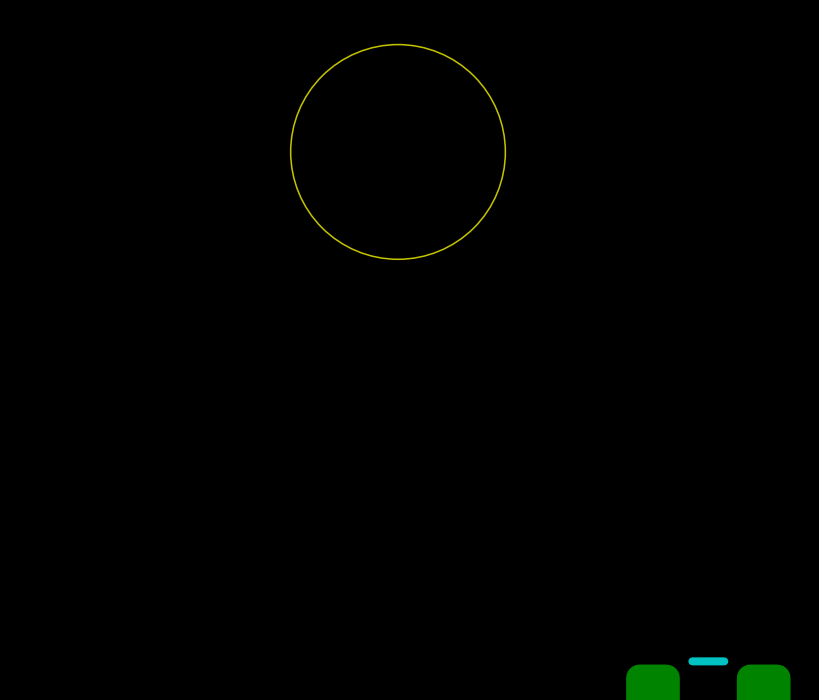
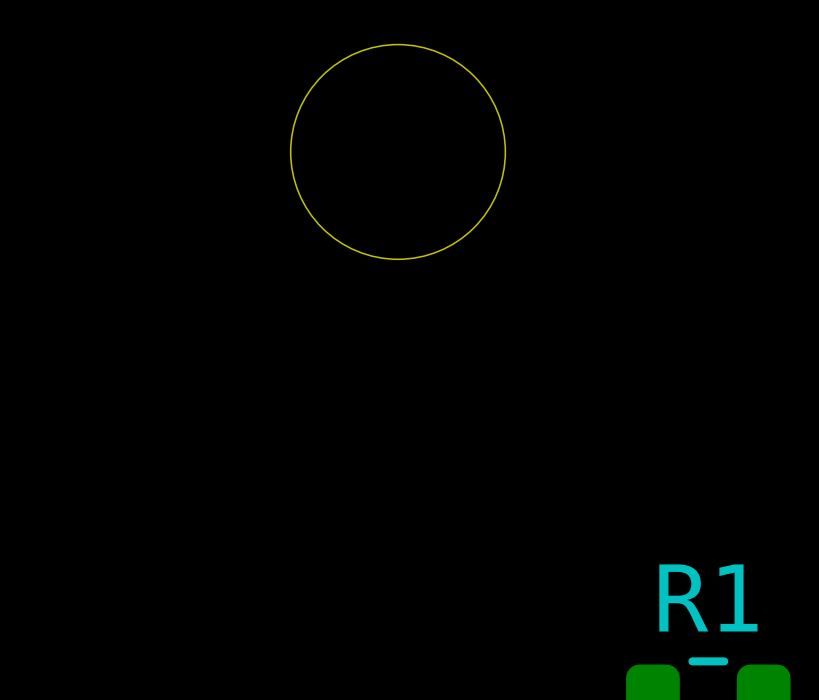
R1 name: none -> R1 (708, 597)

